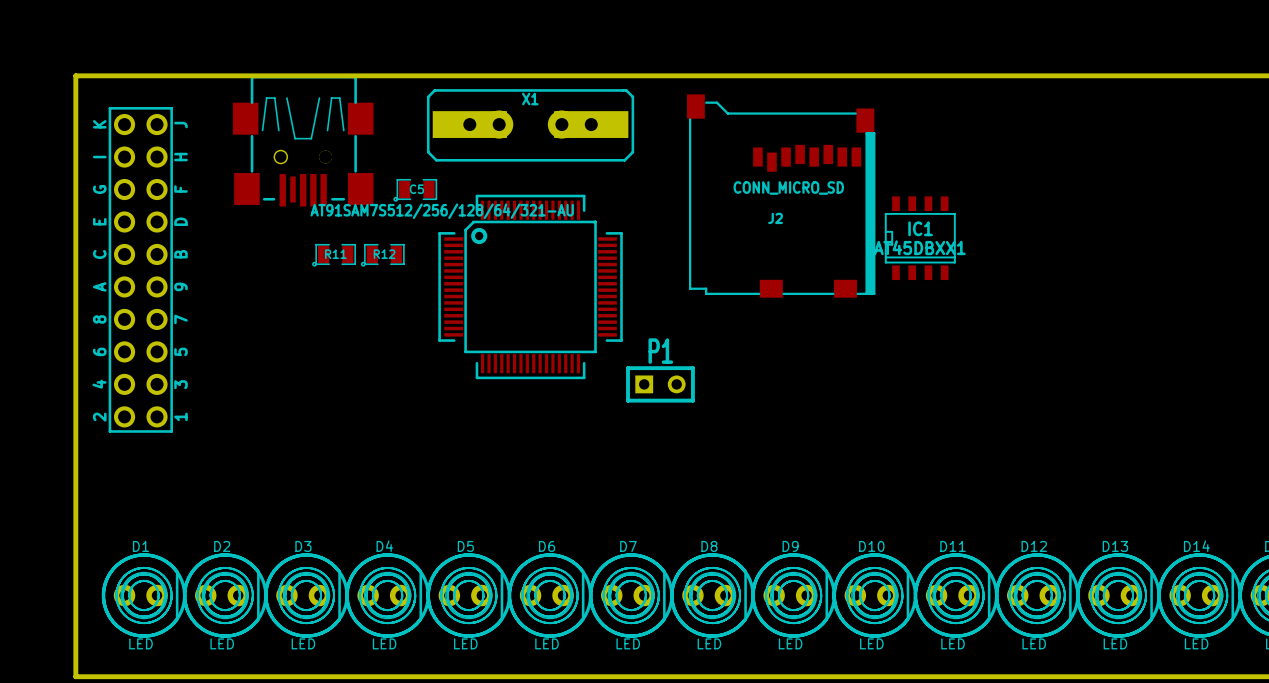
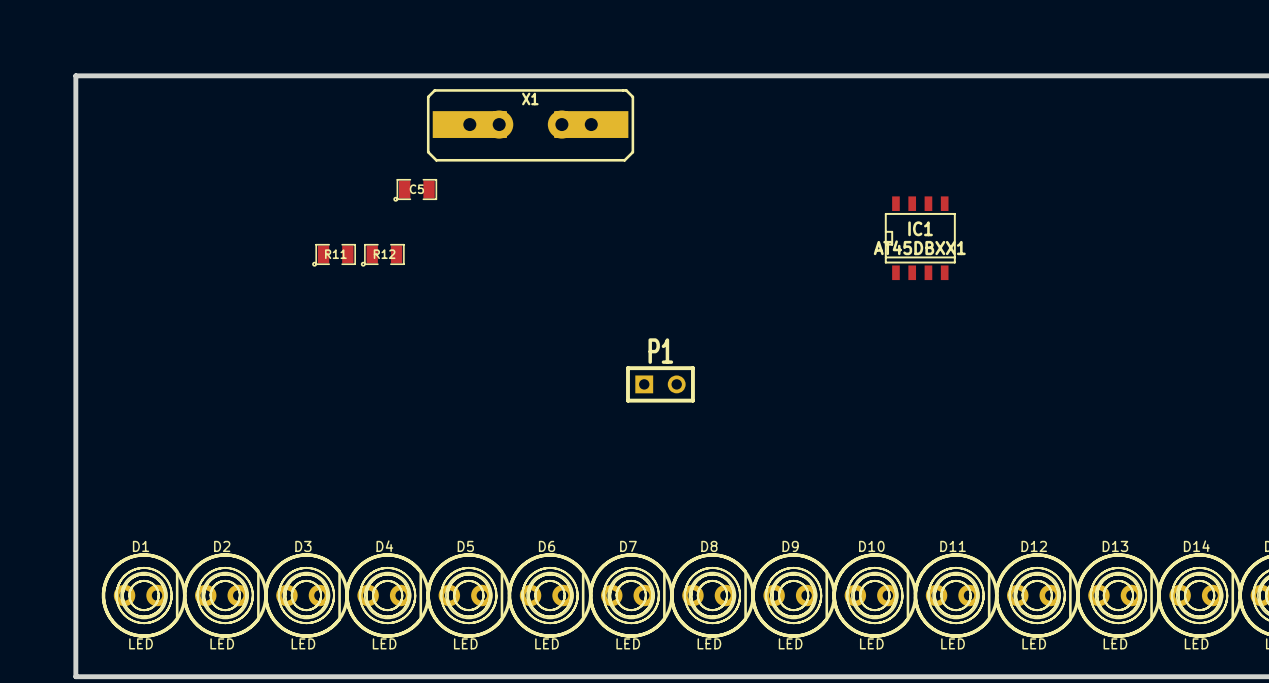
part: (303, 141) -> none
J2: CONN_MICRO_SD (781, 196) -> none
part: (140, 269) -> none
part: AT91SAM7S512/256/128/64/321-AU (530, 286) -> none

